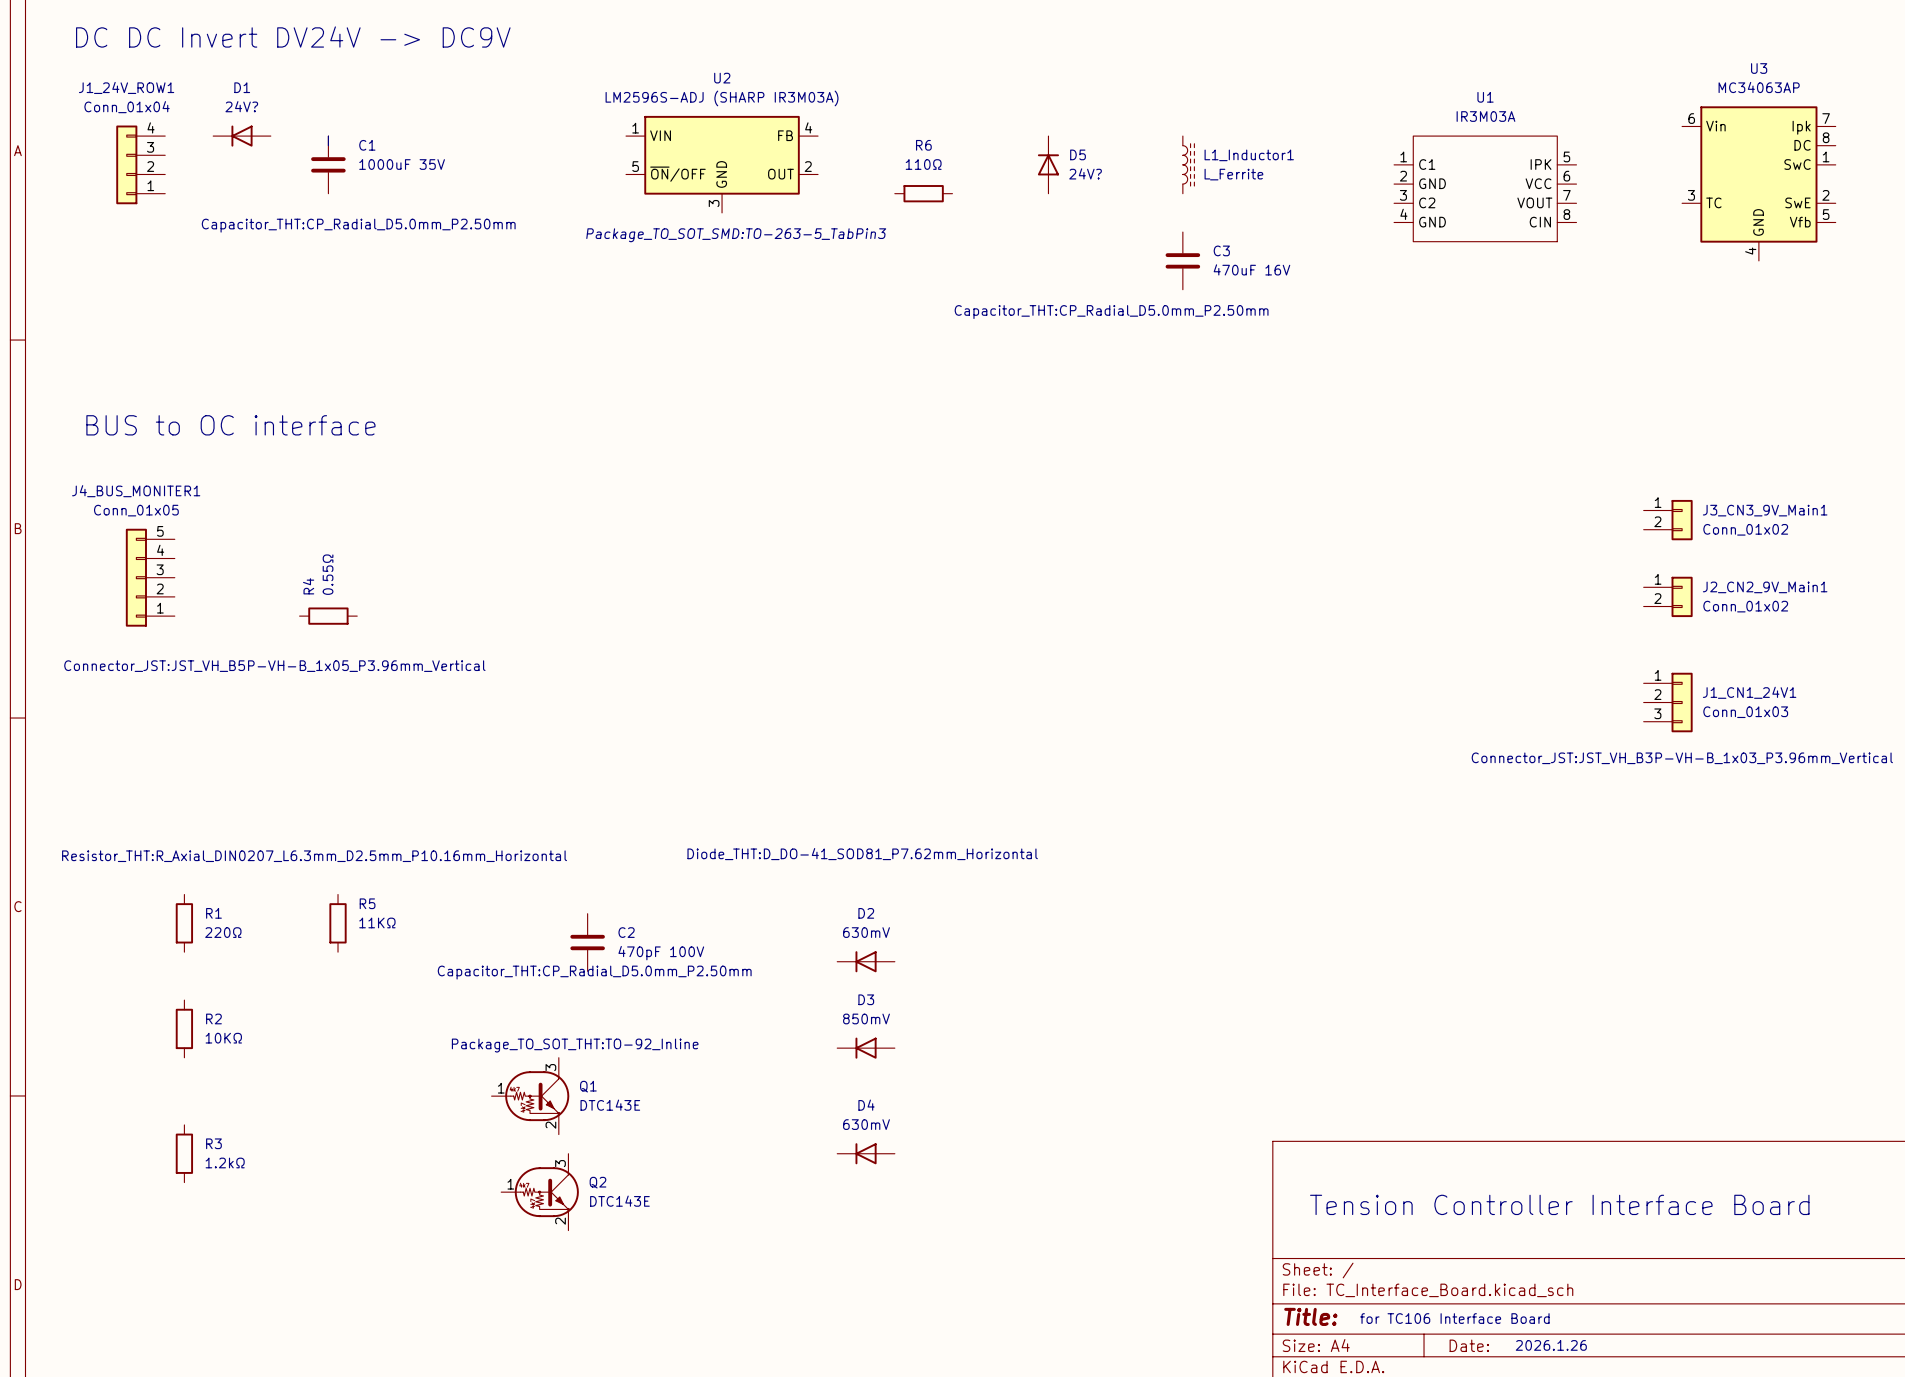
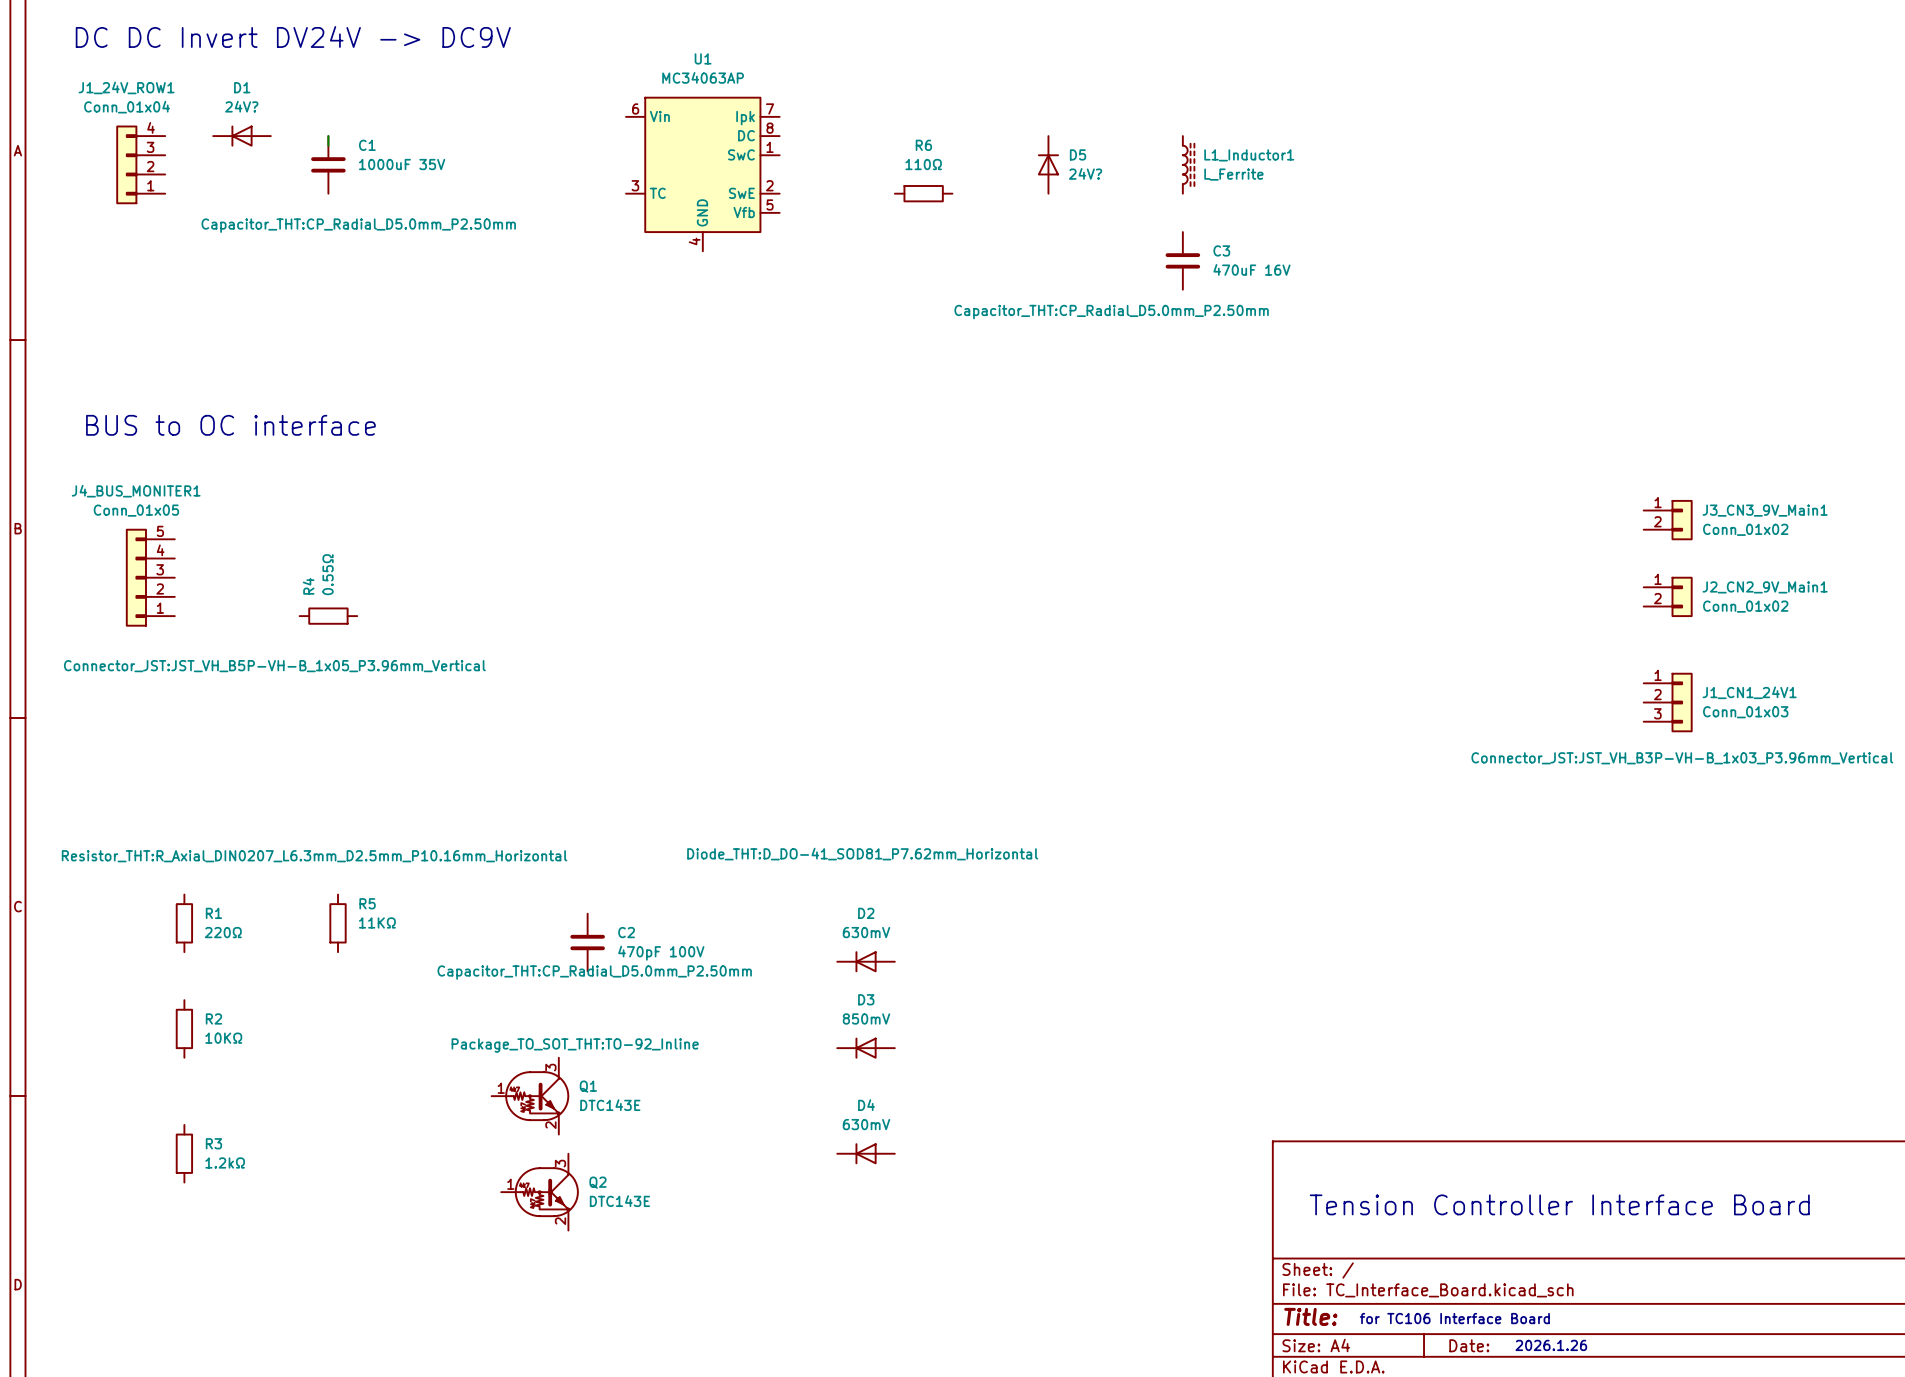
U1 name position: U1 (1485, 97) -> U1 (703, 58)
U1 value: IR3M03A (1485, 116) -> MC34063AP (703, 77)
U1 symbol: [1394, 136, 1577, 242] -> [626, 96, 780, 252]
U2: LM2596S-ADJ (SHARP IR3M03A) (722, 164) -> none
U3: MC34063AP (1758, 183) -> none

